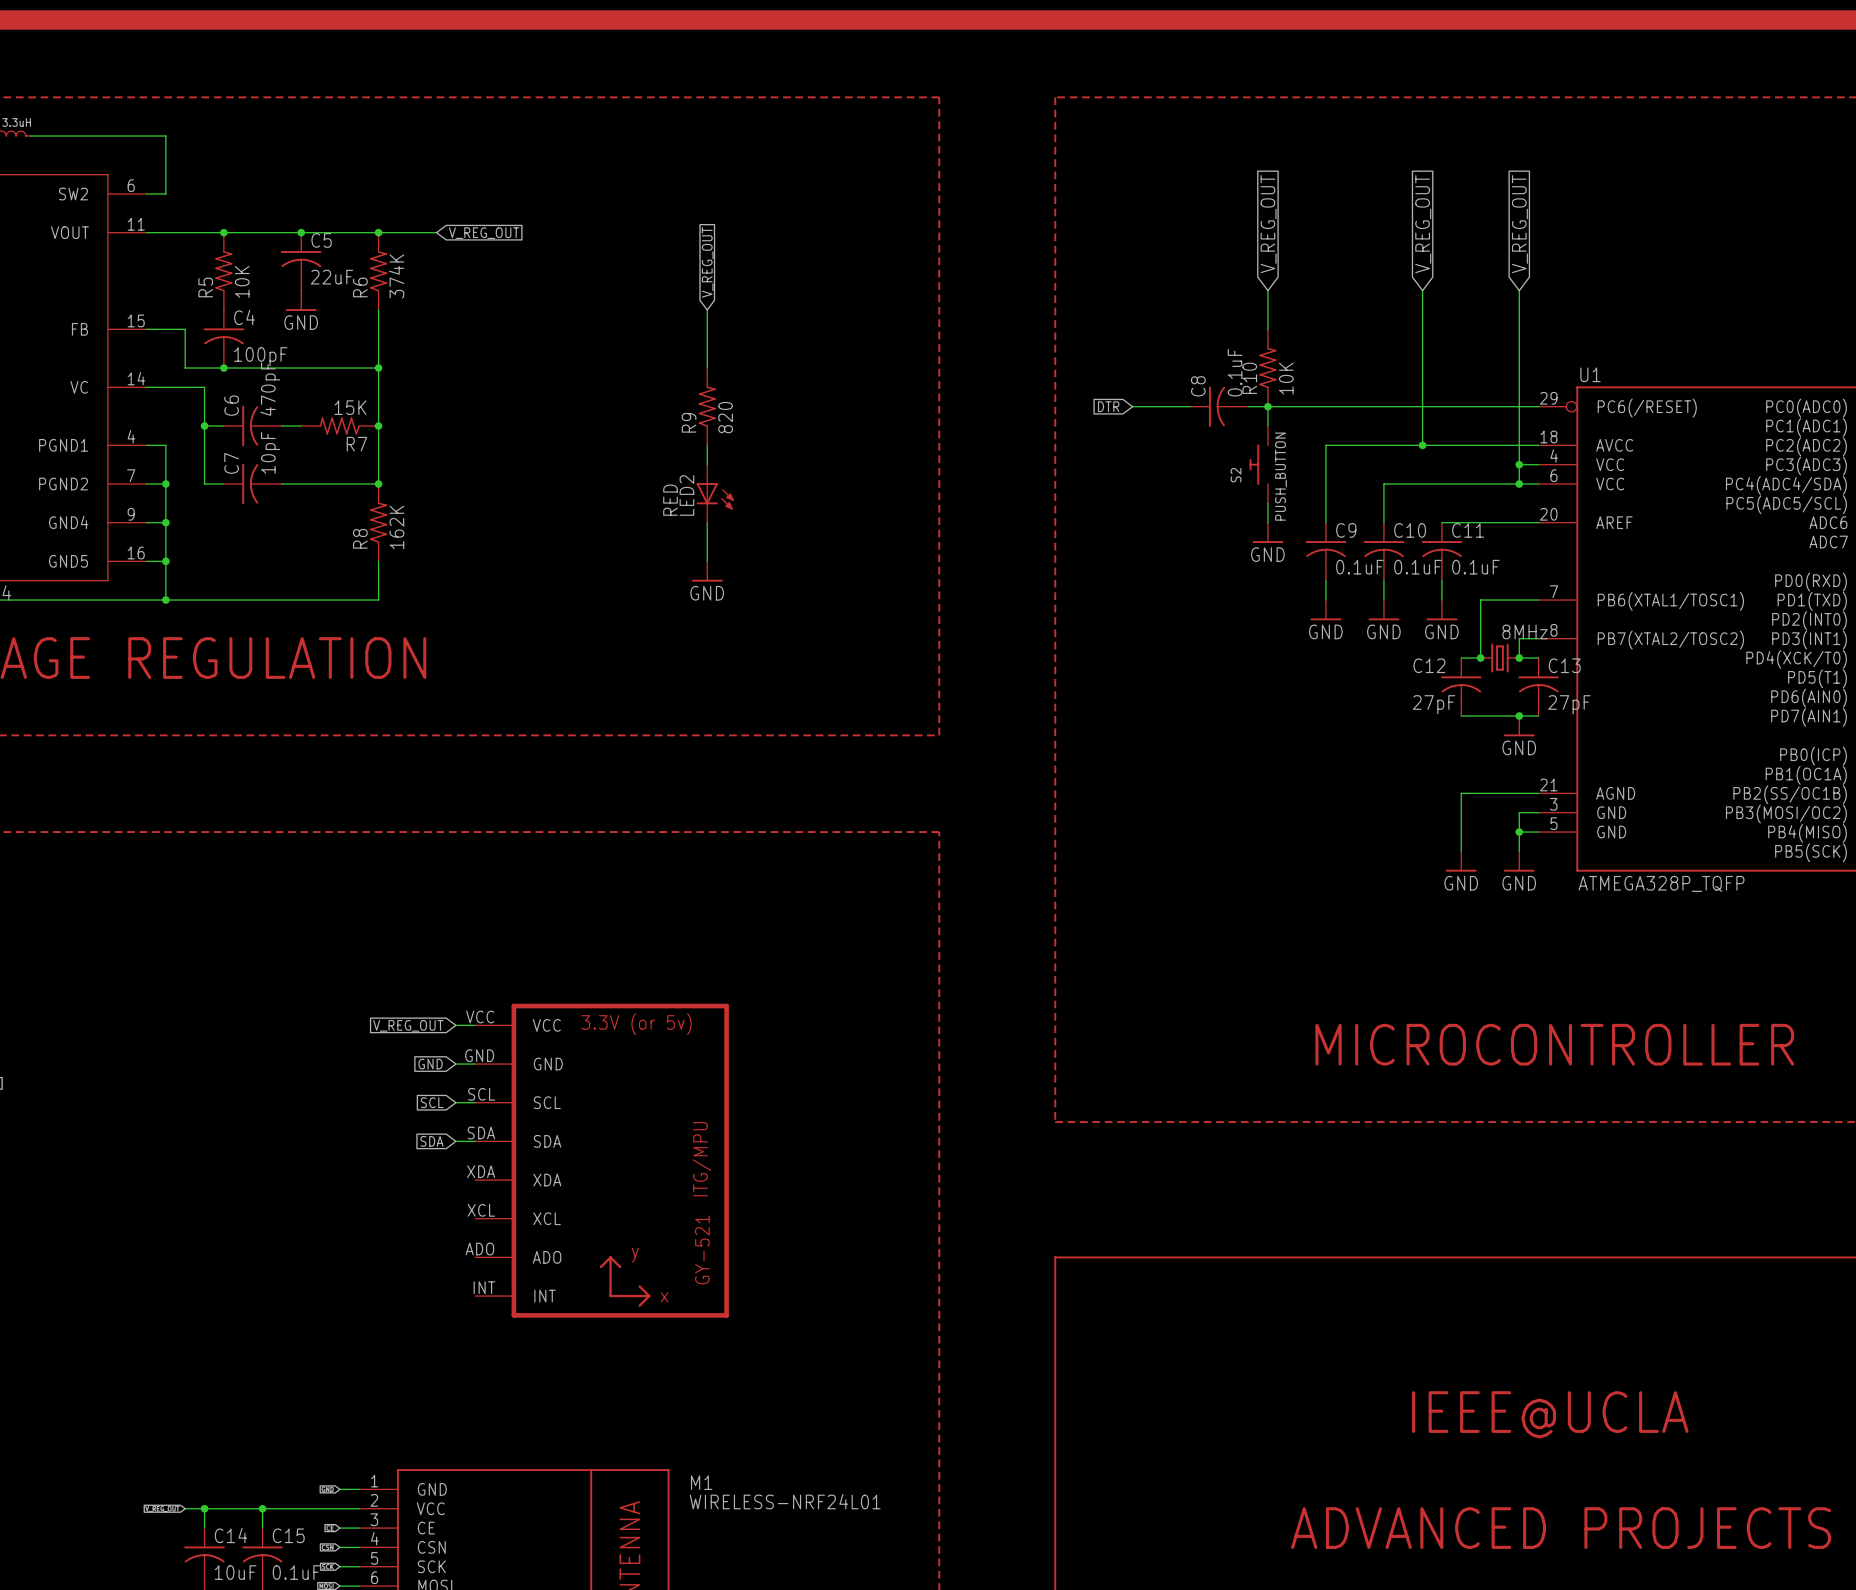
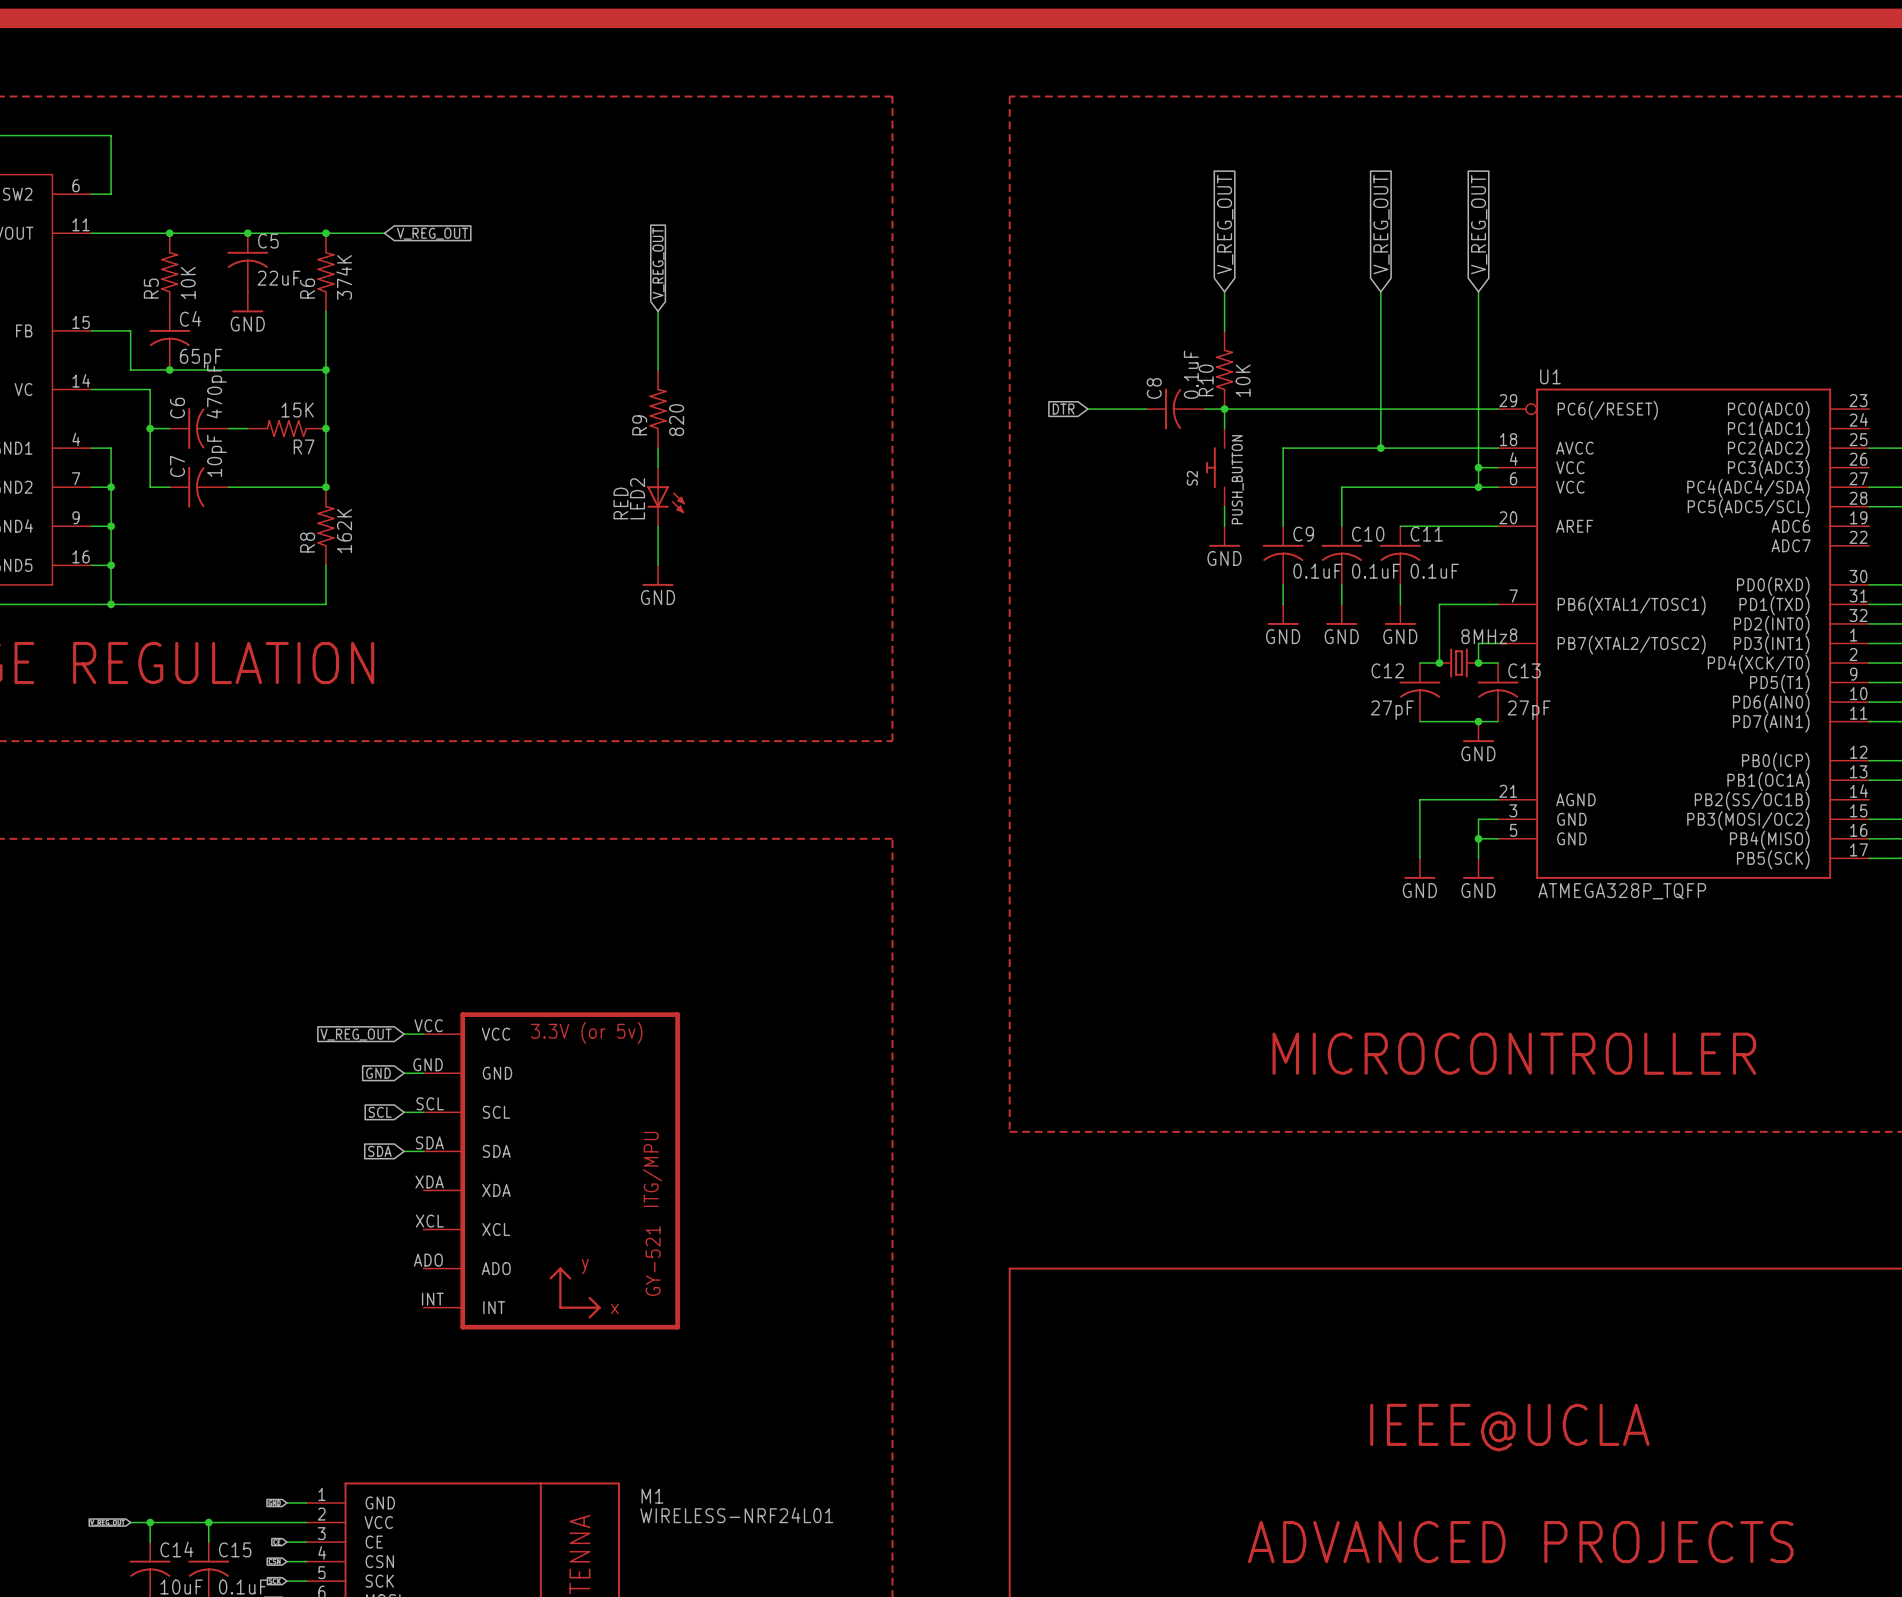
C4 value: 100pF (260, 356) -> 65pF (201, 358)

